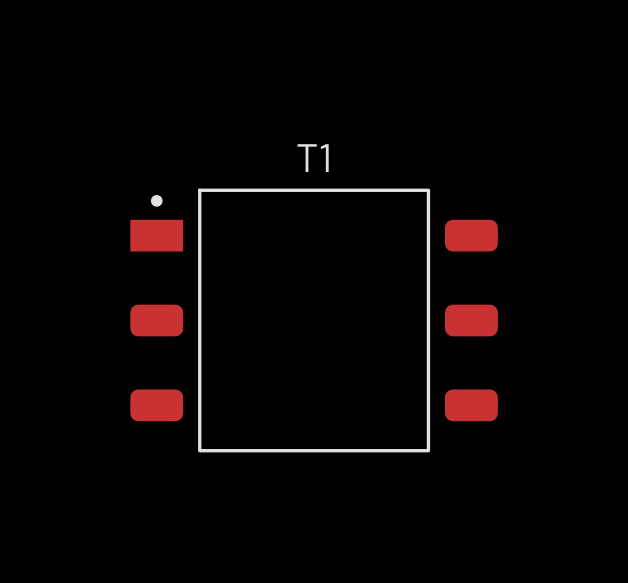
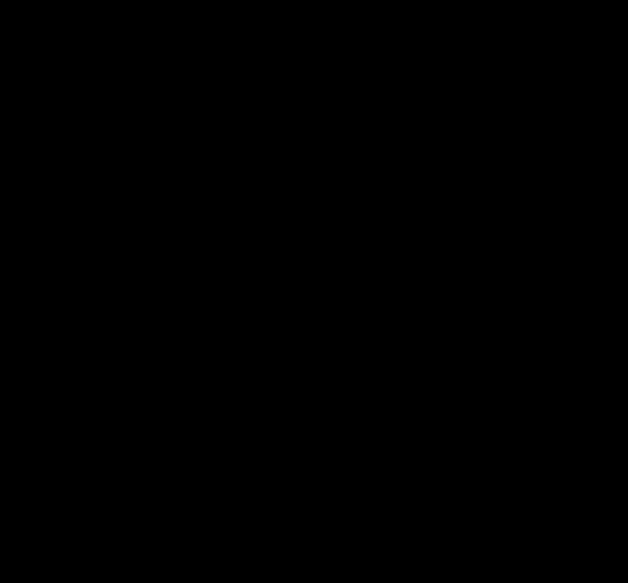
T1: (314, 320) -> none

